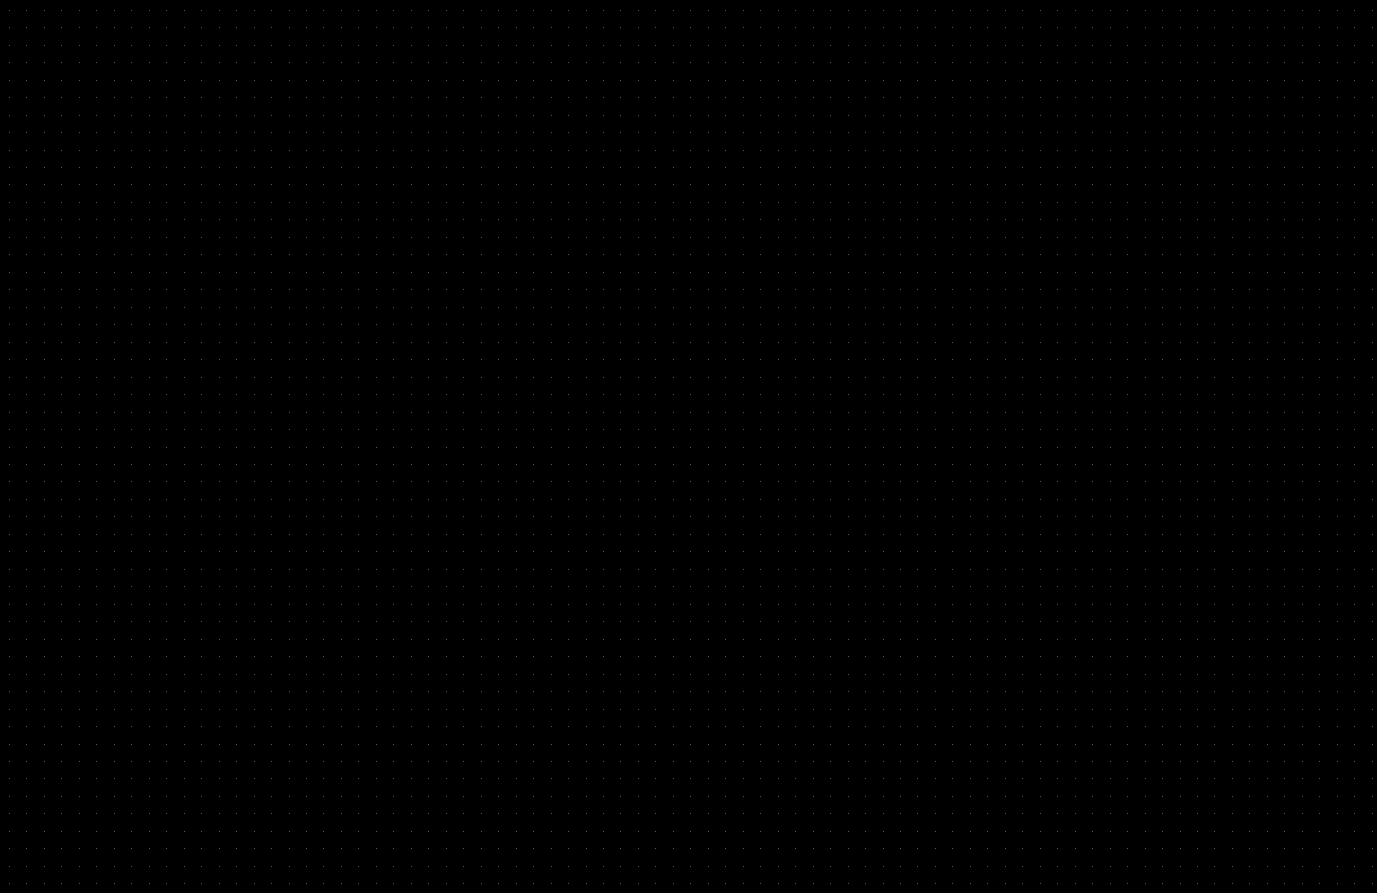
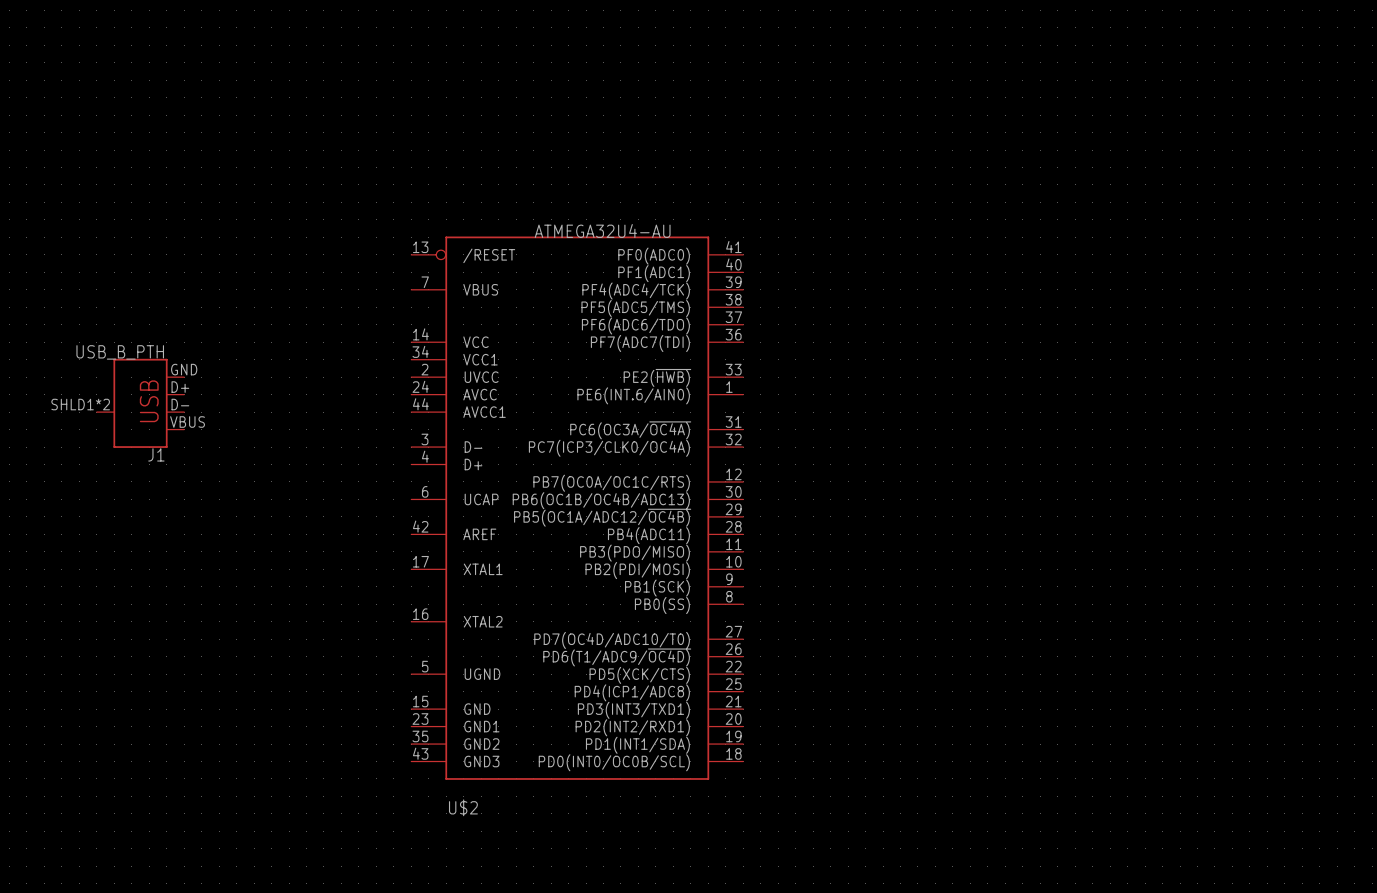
J1: none -> USB_B_PTH (140, 403)
U$2: none -> ATMEGA32U4-AU (577, 508)

